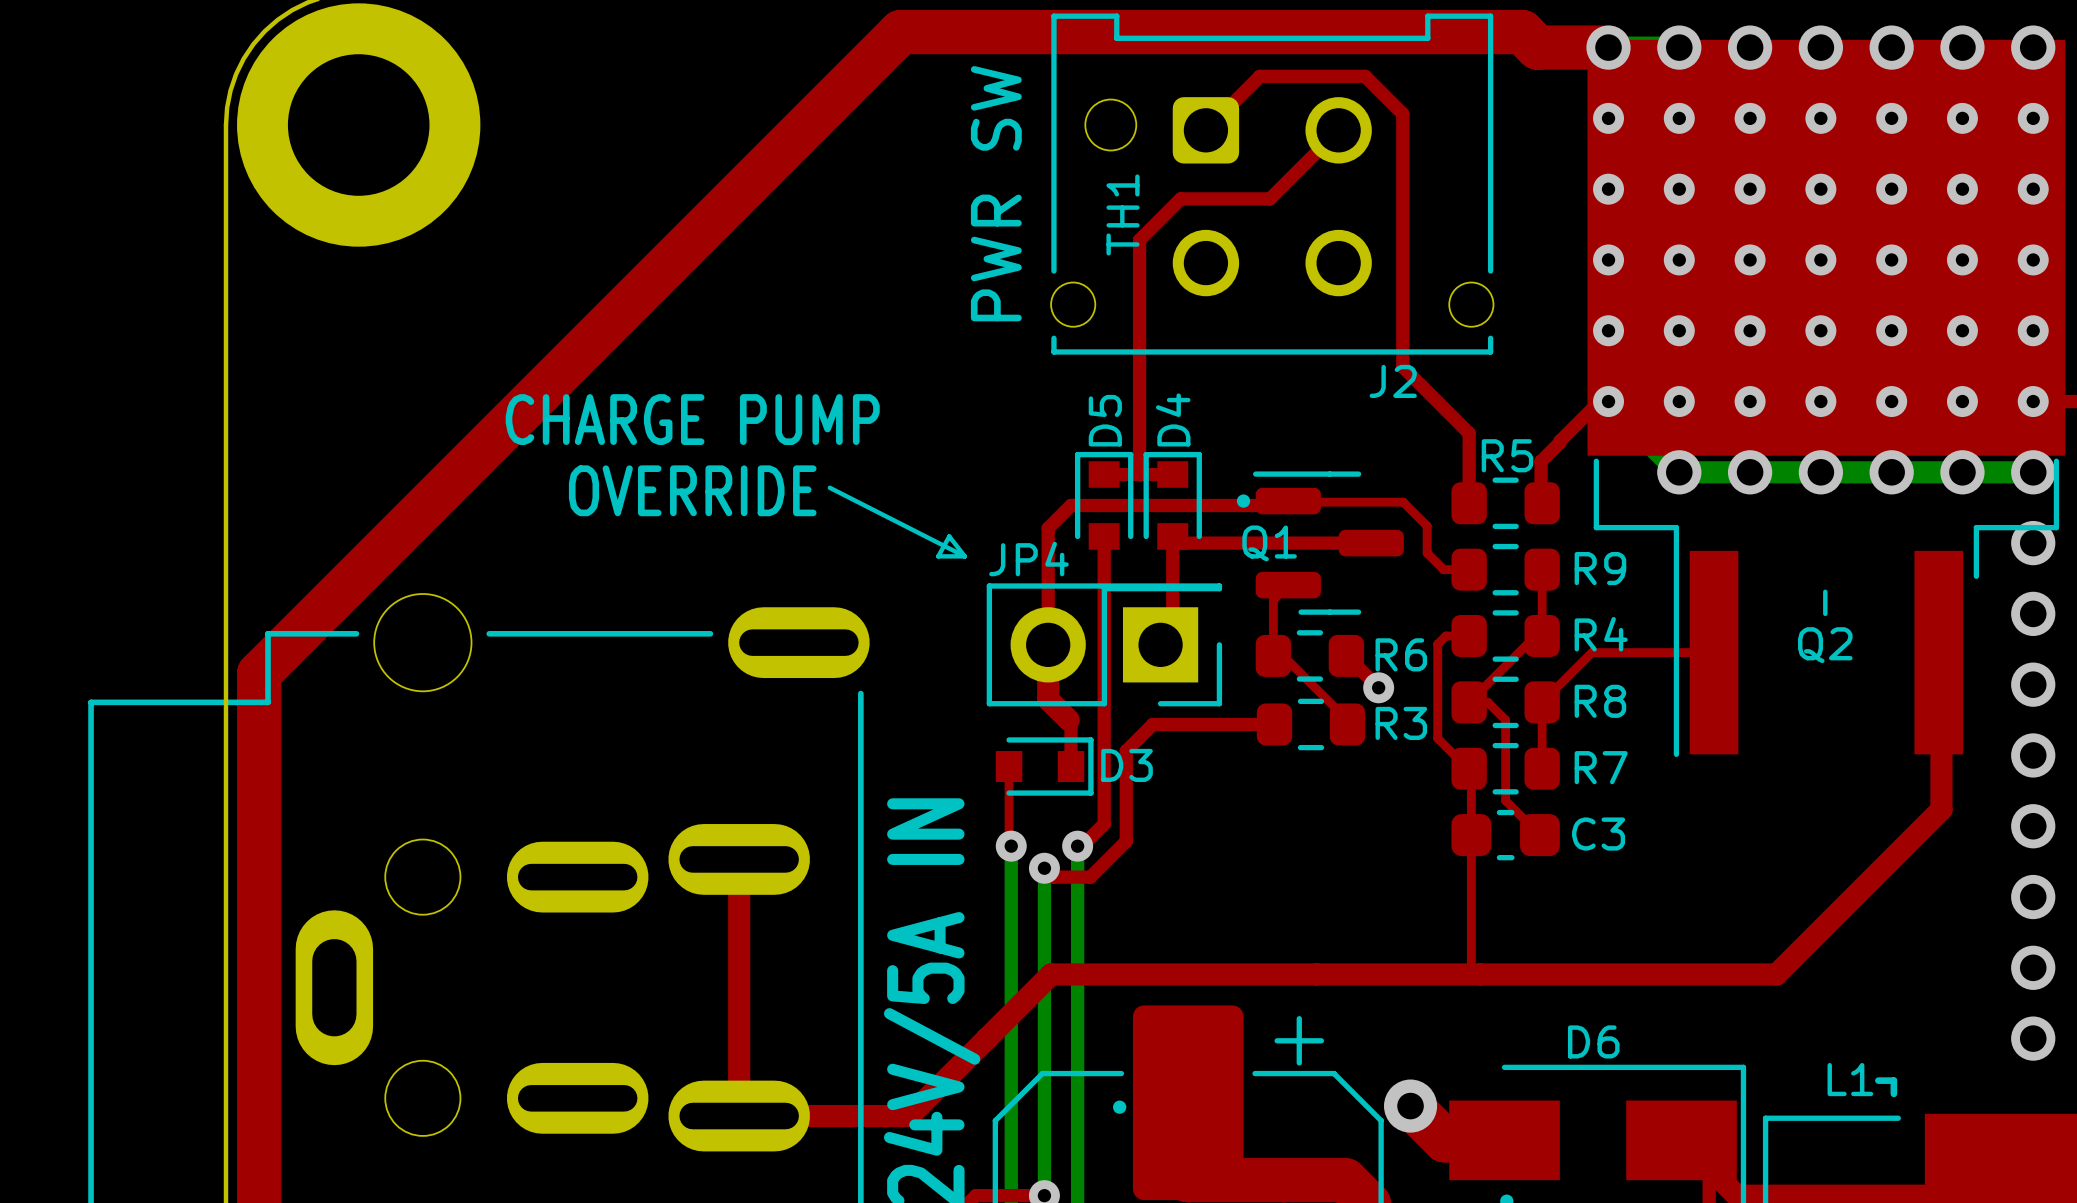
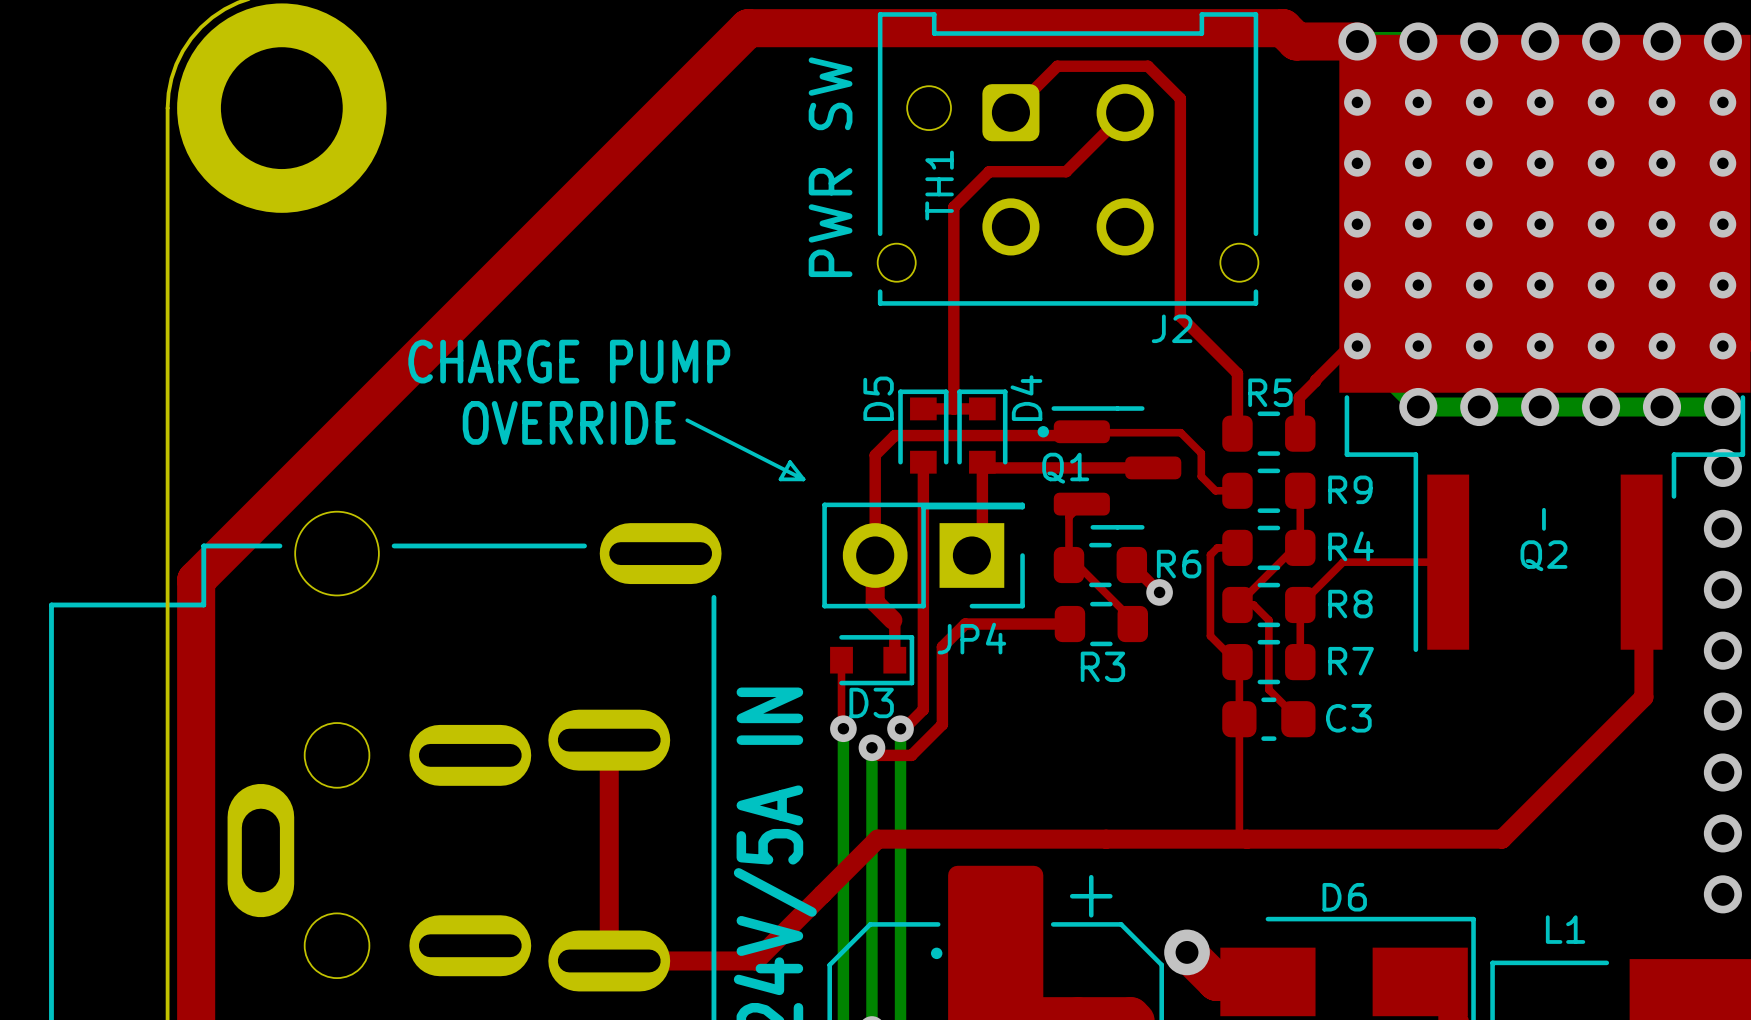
D4 name position: D4 (1173, 419) -> D4 (1026, 398)
D5 name position: D5 (1105, 420) -> D5 (878, 398)
JP4 name position: JP4 (1028, 559) -> JP4 (971, 638)
R3 name position: R3 (1401, 723) -> R3 (1102, 666)
D3 name position: D3 (1127, 765) -> D3 (871, 702)
line: (1878, 1080) (1893, 1080) (1893, 1093) -> none

